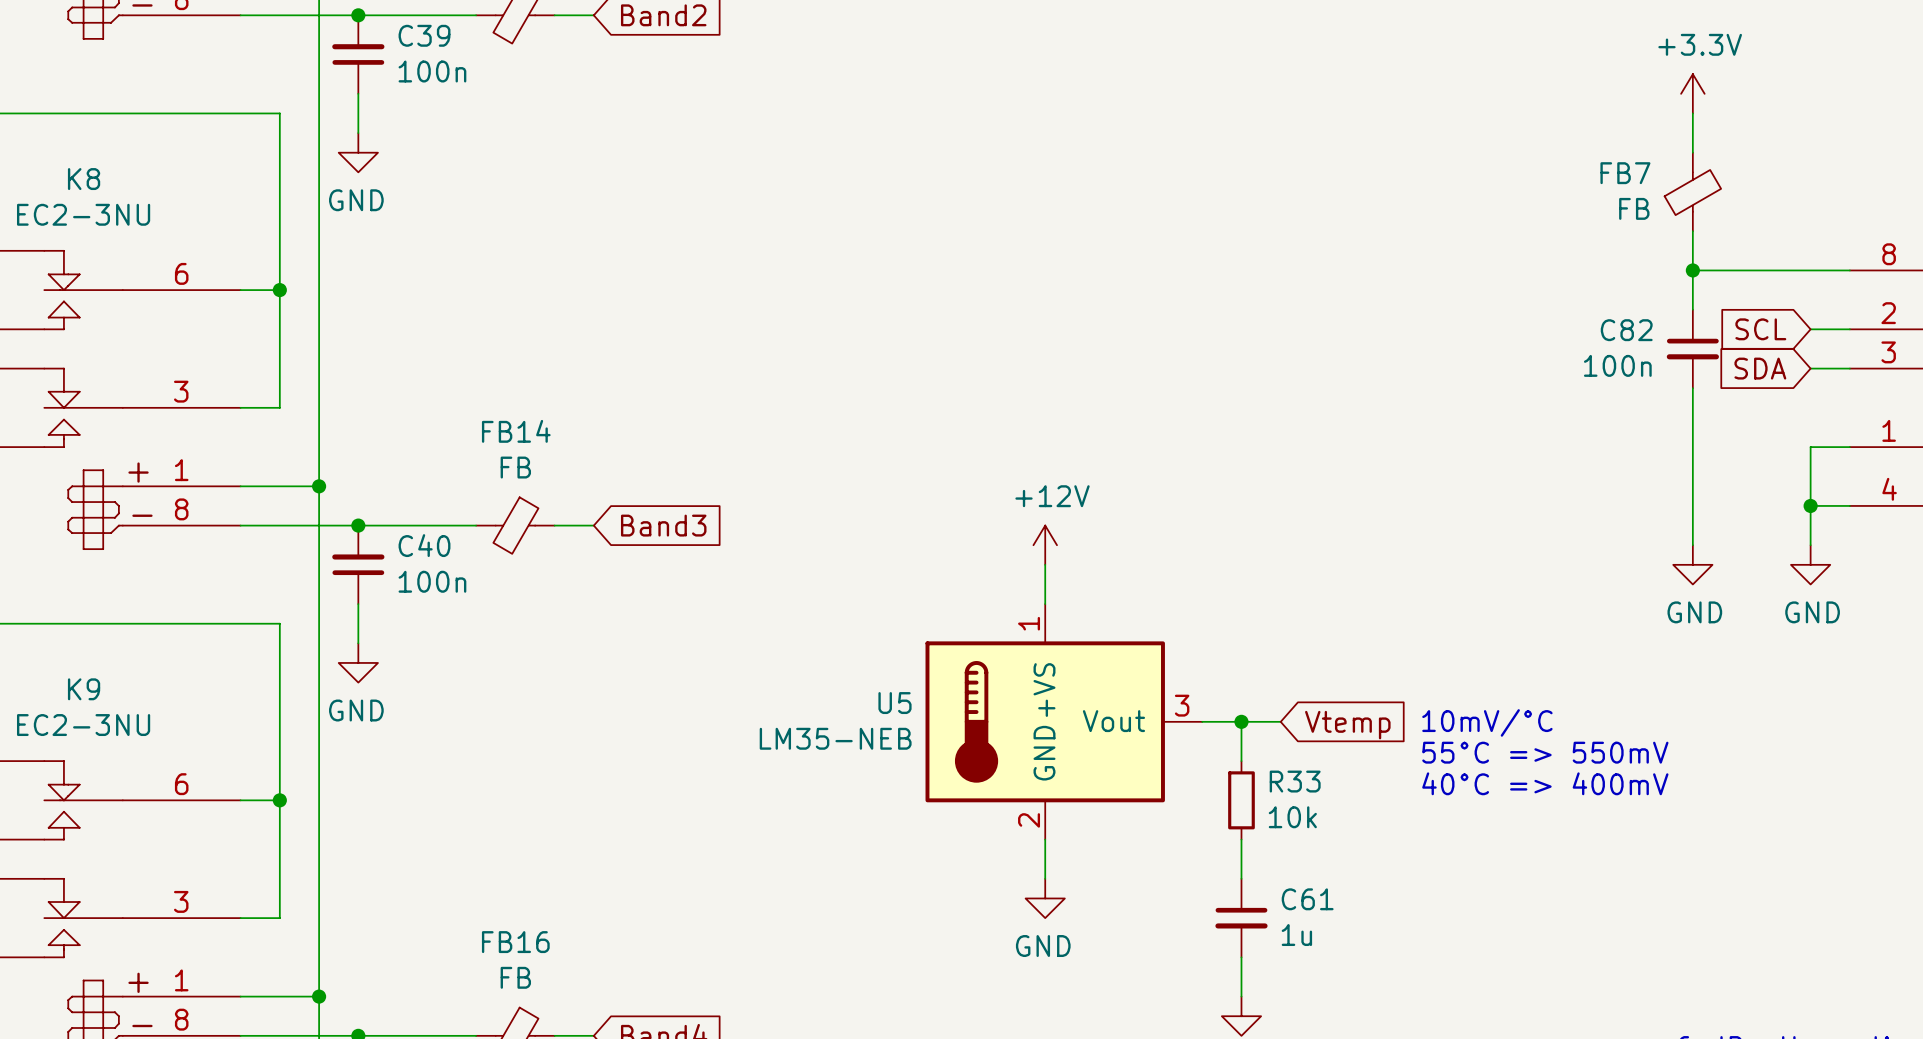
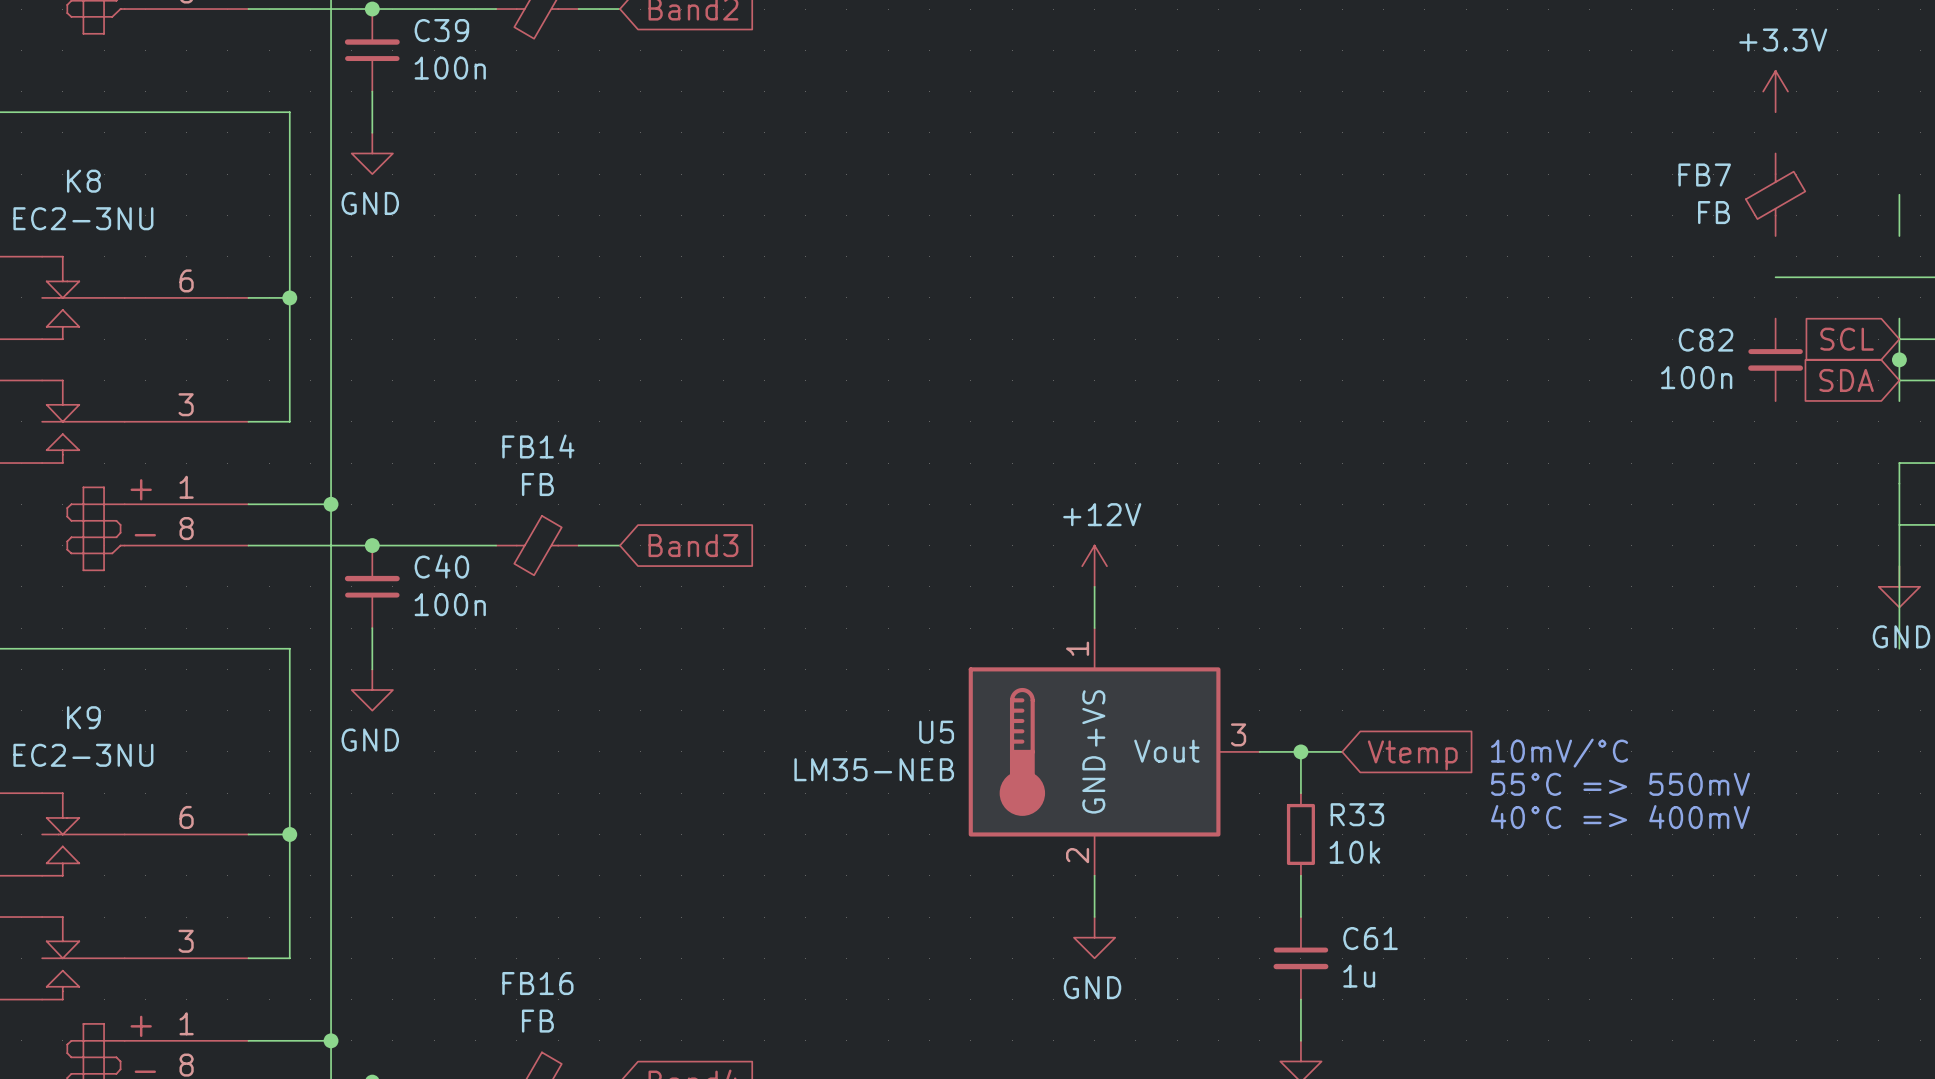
wire: (1692, 113) (1692, 152) -> (1899, 194) (1899, 236)
wire: (1692, 231) (1692, 309) -> (1899, 318) (1899, 401)
junction: (1692, 270) -> none
junction: none -> (1899, 359)
wire: (1692, 388) (1692, 545) -> none
junction: (1810, 505) -> none
wire: none -> (1899, 566) (1899, 648)
power symbol: GND (1692, 564) -> none

